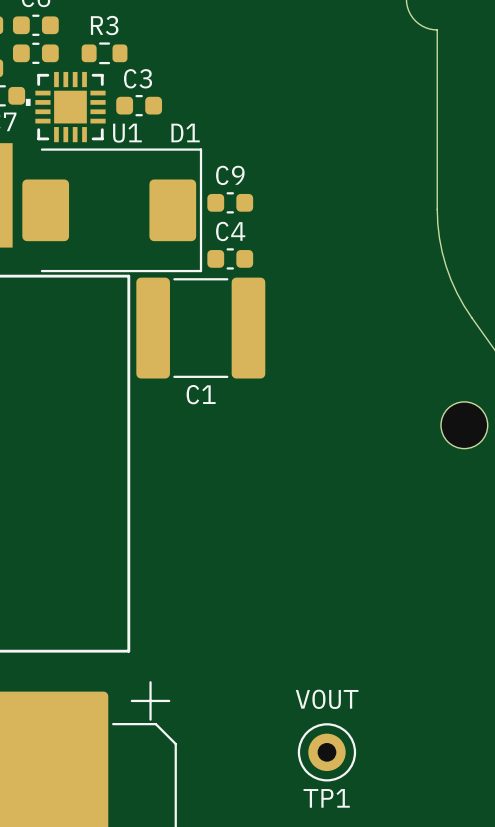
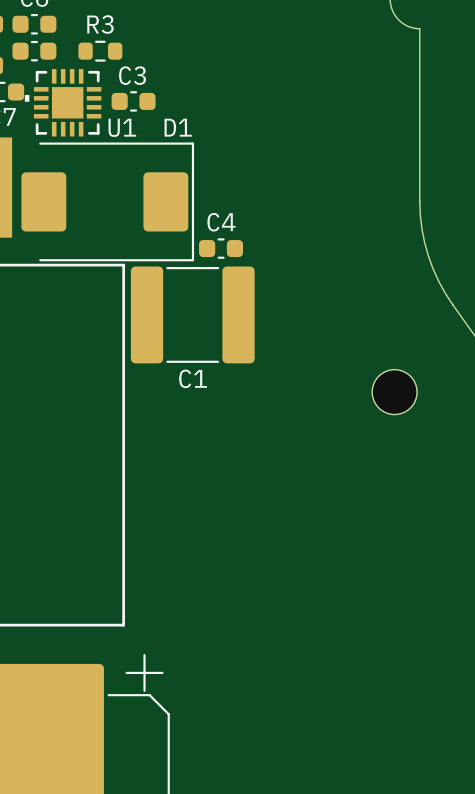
C9: (230, 202) -> none
part position: (464, 425) -> (394, 392)
TP1: VOUT (326, 752) -> none

